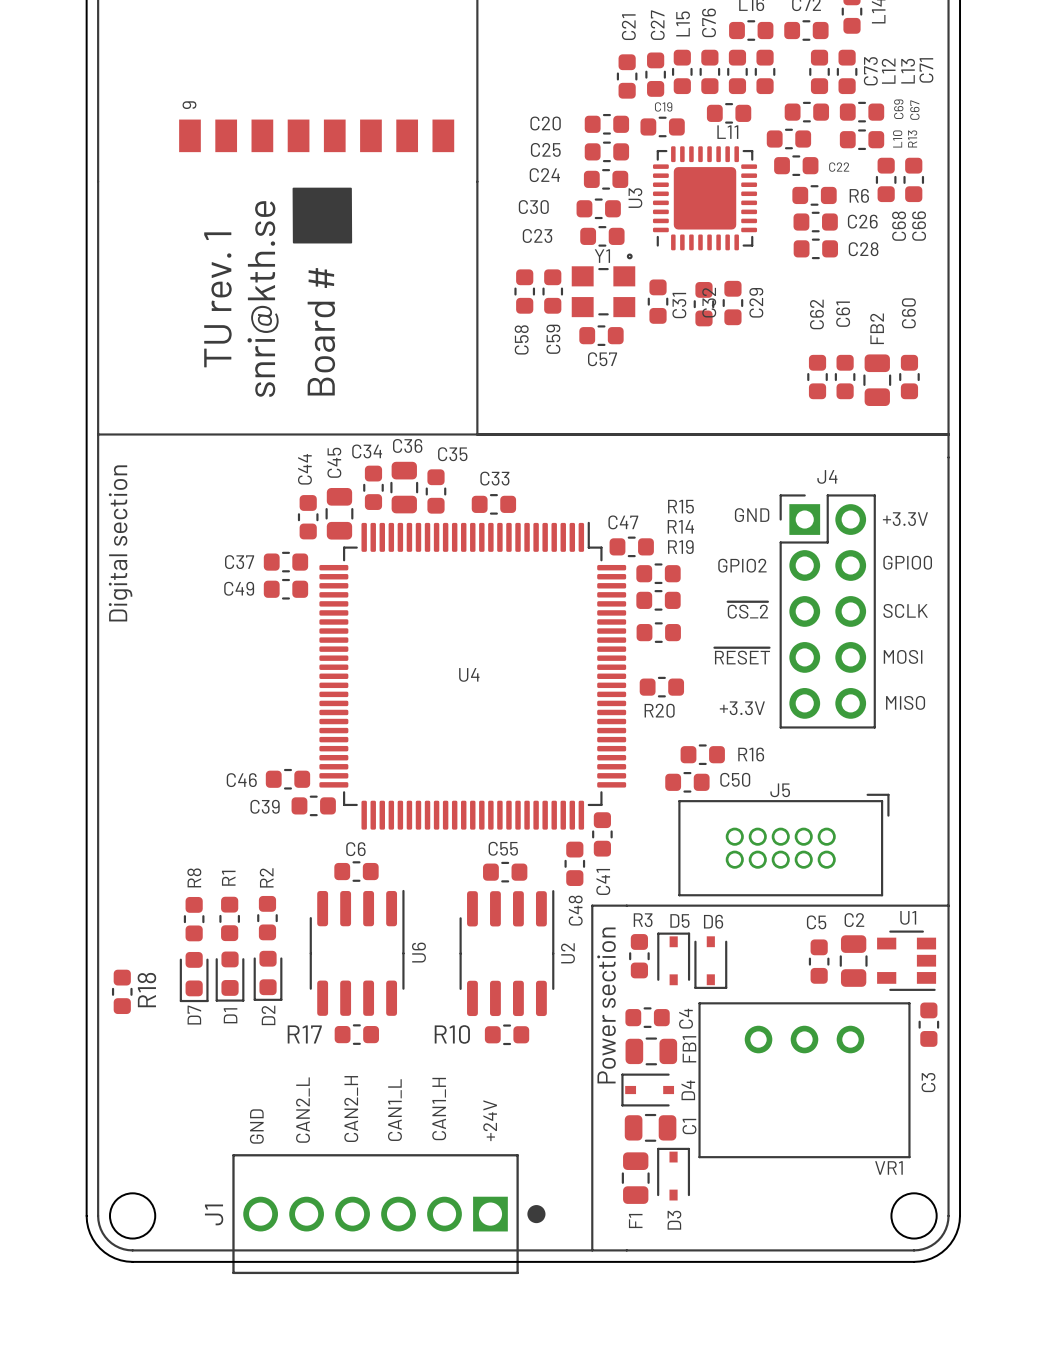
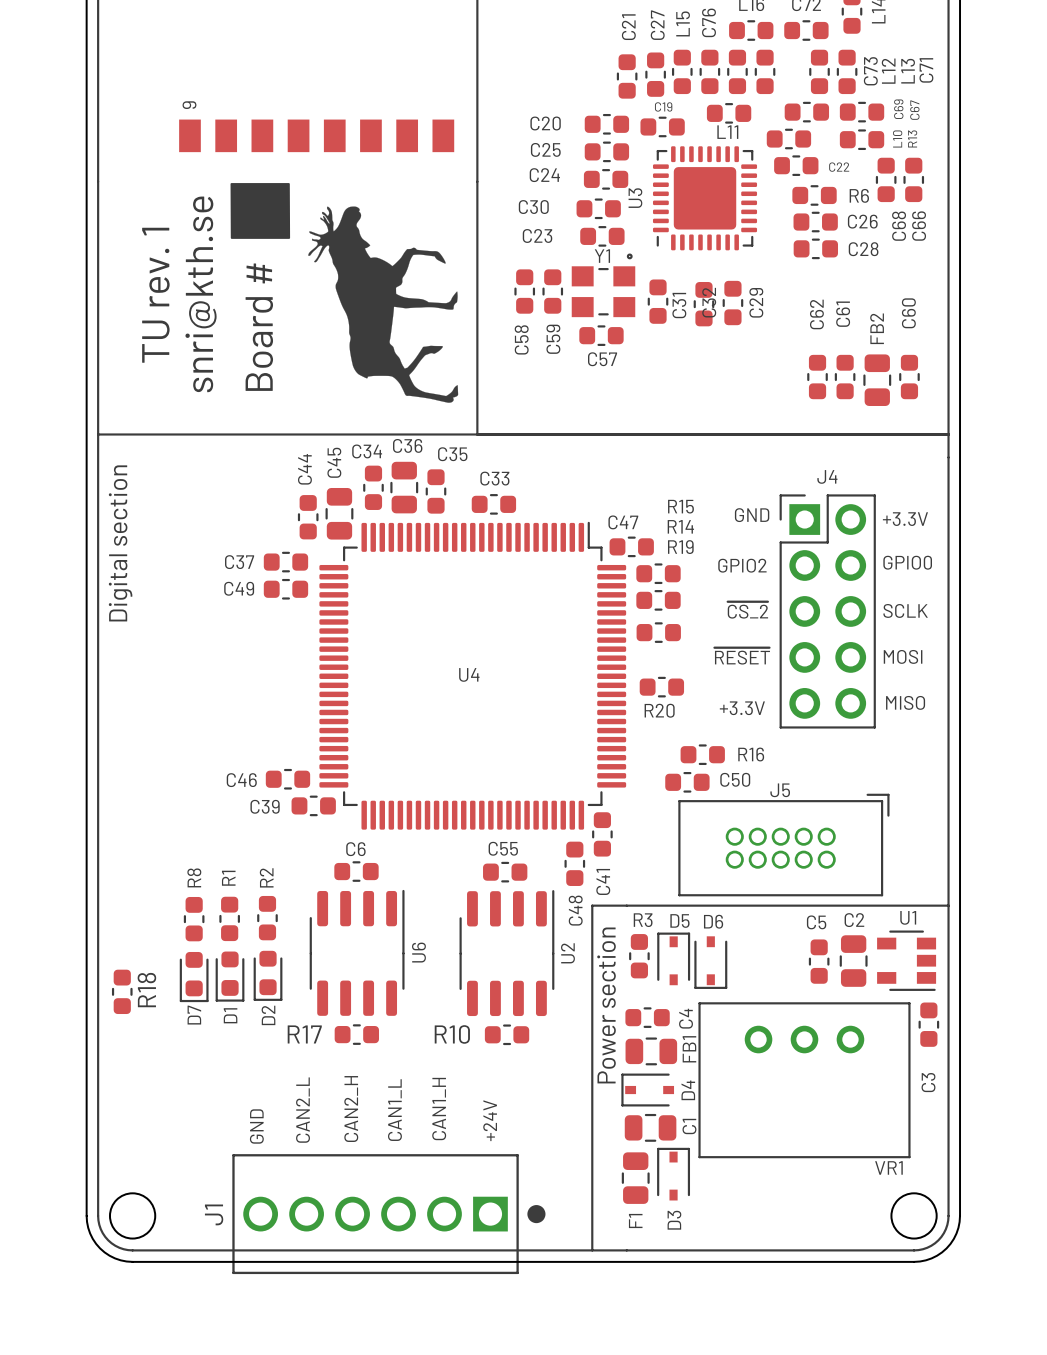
drawing: none -> [308, 206, 459, 403]
drawing position: (322, 215) -> (260, 210)
text position: snri@kth.se (263, 298) -> snri@kth.se (201, 294)
text position: TU rev. 1 (217, 299) -> TU rev. 1 (155, 295)
text position: Board # (321, 331) -> Board # (259, 327)

